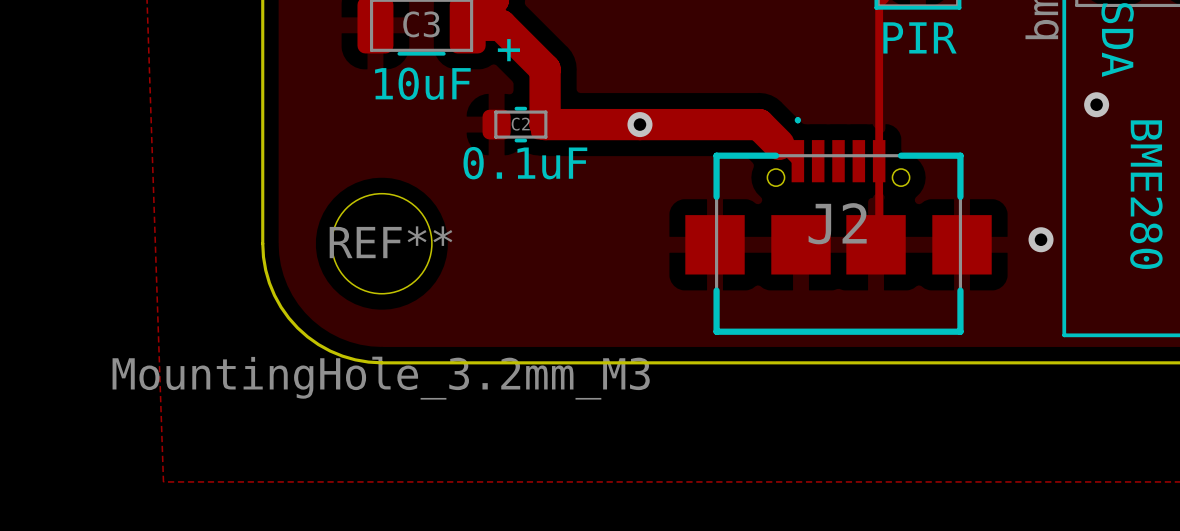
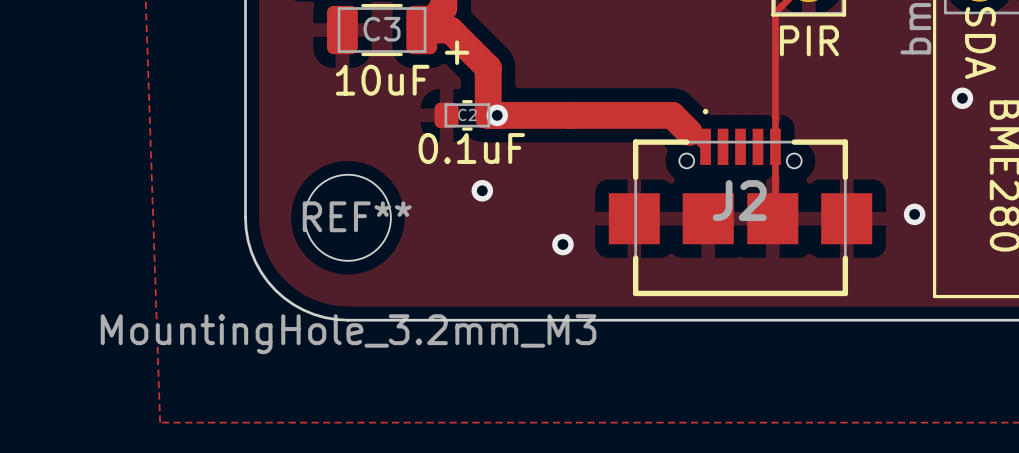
via: none -> (497, 115)
via: (639, 124) -> none
via: none -> (482, 190)
via: none -> (562, 244)

